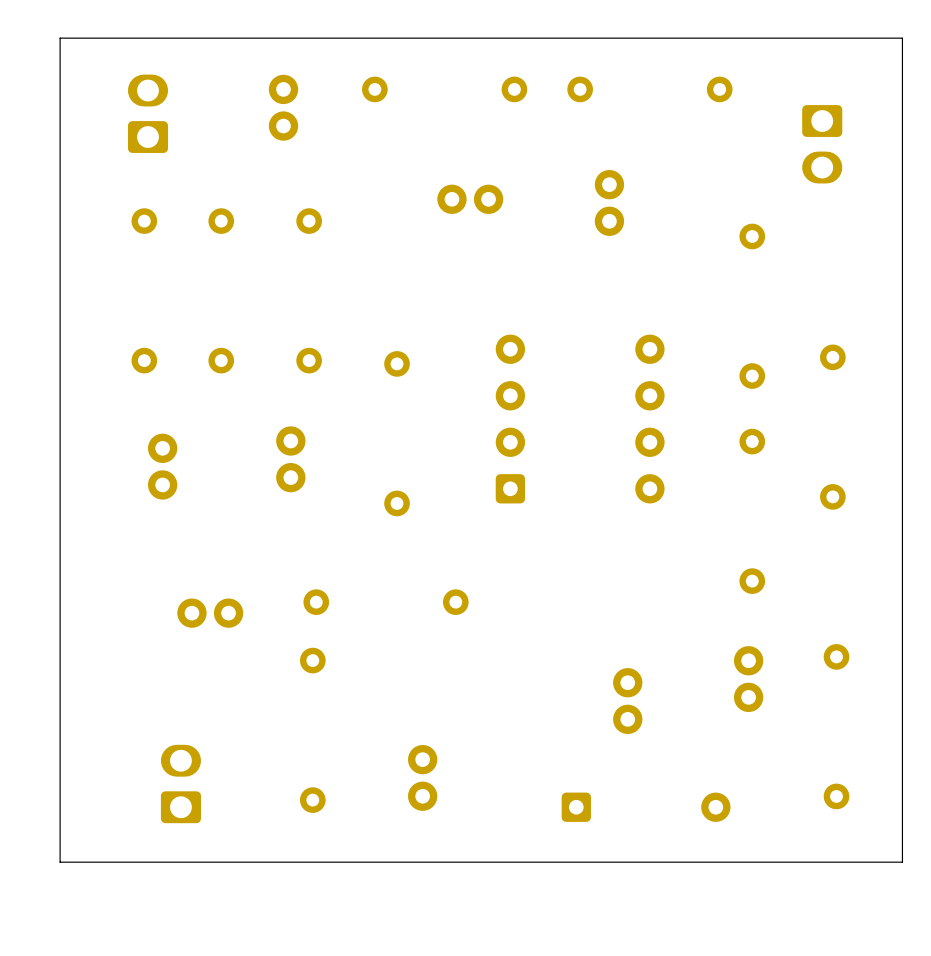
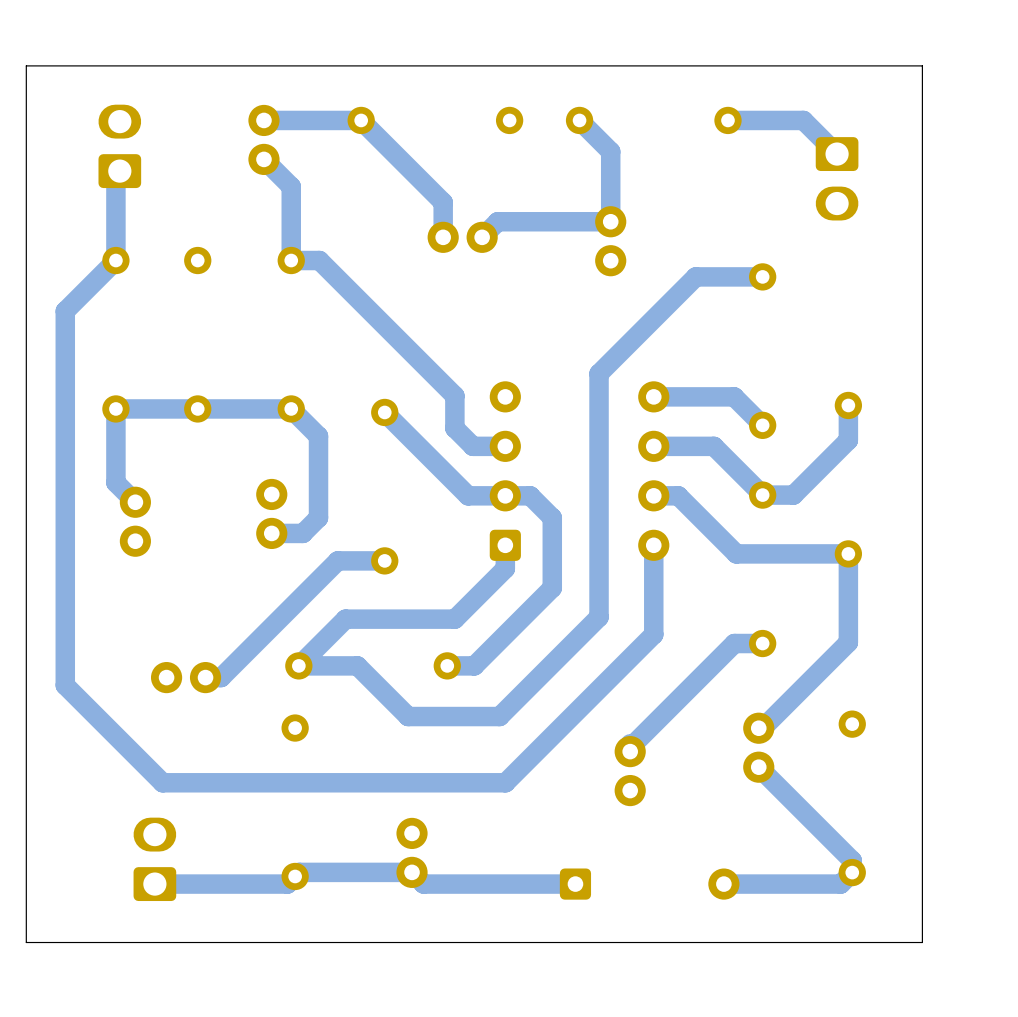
track: none -> (263, 120) (361, 120) (443, 202) (443, 237)
track: none -> (579, 120) (610, 151) (610, 221) (497, 221) (482, 237)
track: none -> (727, 120) (803, 120) (837, 154)
track: none -> (263, 159) (291, 186) (291, 260) (319, 260) (454, 395) (454, 428) (472, 446) (505, 446)
track: none -> (119, 171) (115, 175) (115, 260) (65, 311) (65, 685) (162, 782) (505, 782) (653, 634) (653, 545)
track: none -> (762, 276) (695, 276) (599, 373) (599, 617) (499, 716) (408, 716) (357, 665) (298, 665) (345, 619) (454, 619) (505, 568) (505, 545)
track: none -> (653, 396) (734, 396) (762, 425)
track: none -> (848, 405) (848, 440) (793, 495) (762, 495) (713, 446) (653, 446)
track: none -> (384, 412) (468, 495) (530, 495) (552, 517) (552, 587) (474, 665) (447, 665)
track: none -> (653, 495) (678, 495) (736, 553) (848, 553) (848, 642) (762, 728) (758, 728)
track: none -> (135, 502) (115, 482) (115, 408) (291, 408) (318, 436) (318, 517) (302, 533) (271, 533)
track: none -> (384, 560) (337, 560) (221, 677) (205, 677)
track: none -> (762, 643) (734, 643) (634, 743) (630, 743)
track: none -> (758, 767) (852, 860) (852, 872) (840, 884) (723, 884)
track: none -> (575, 884) (423, 884) (412, 872) (299, 872) (287, 884) (154, 884)

